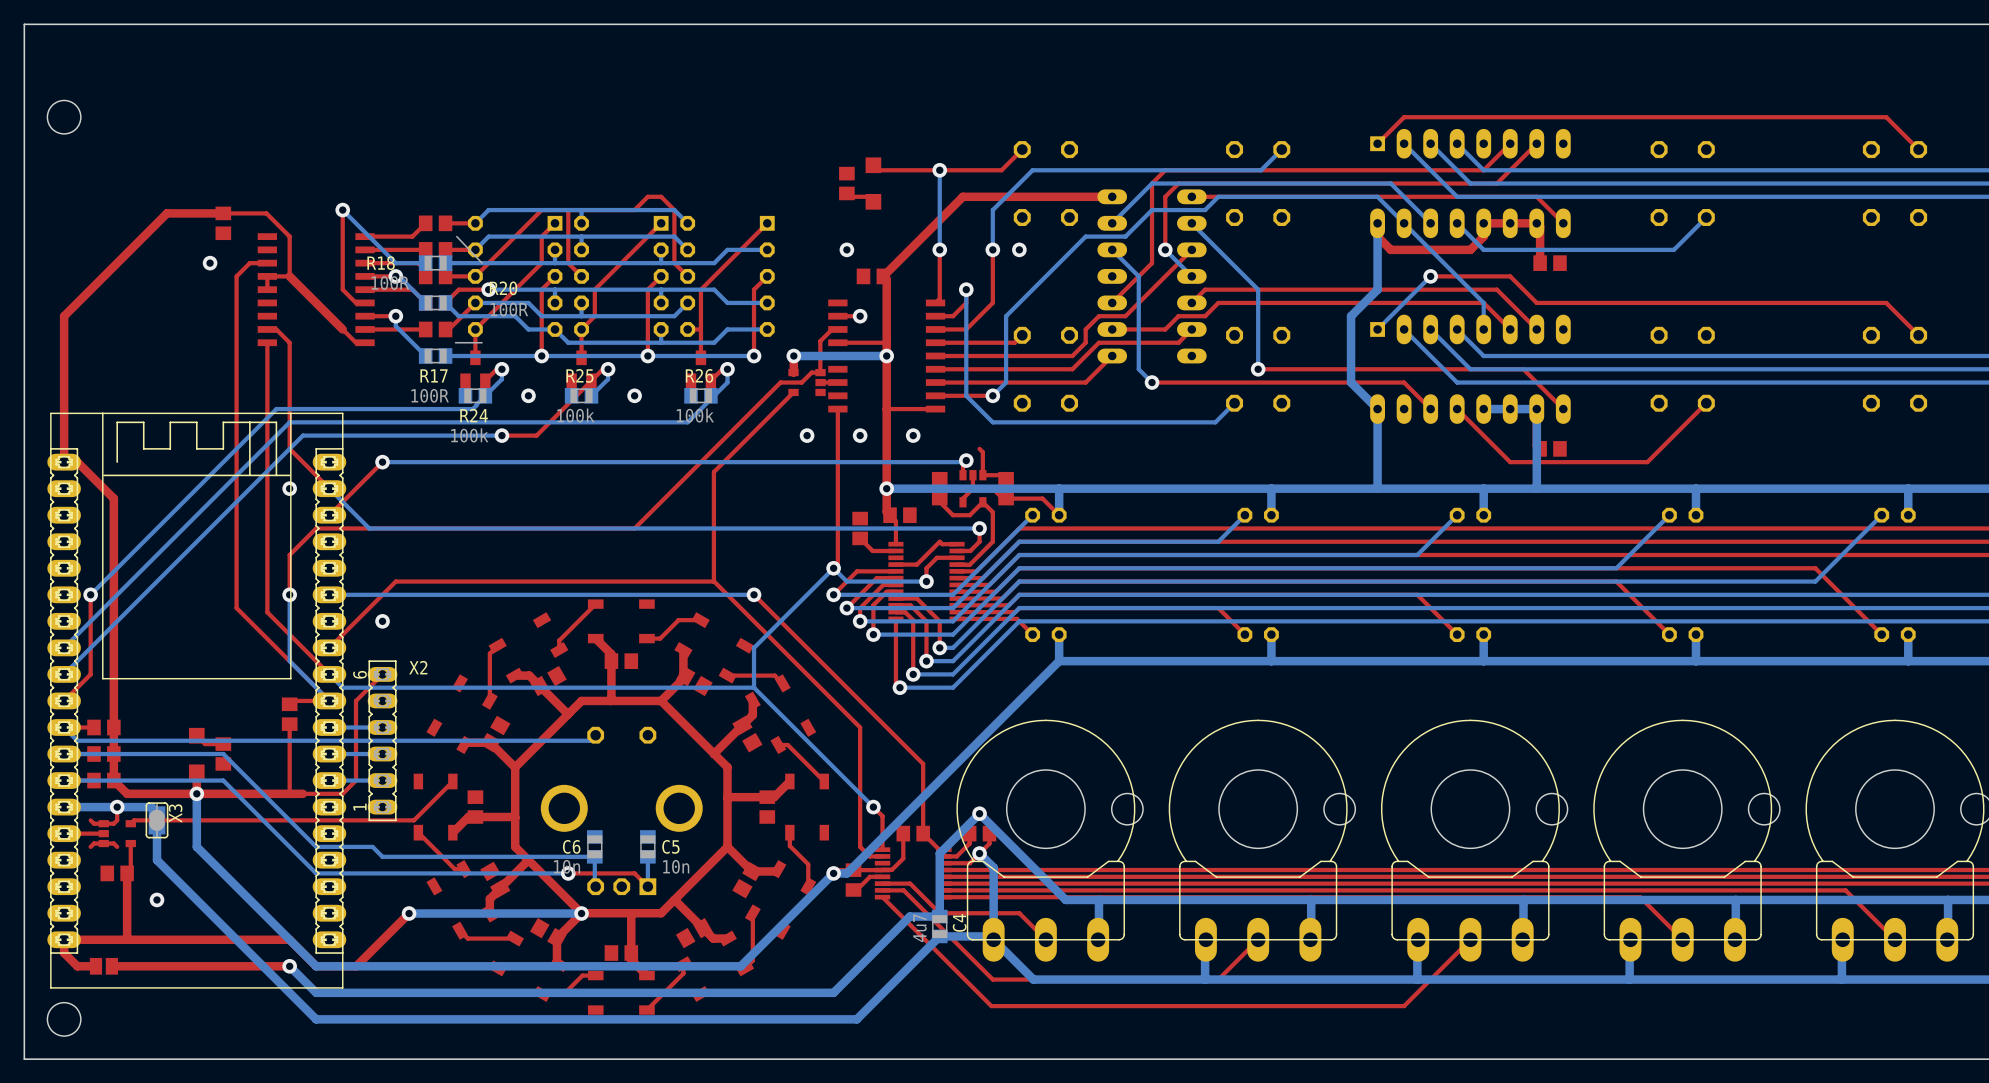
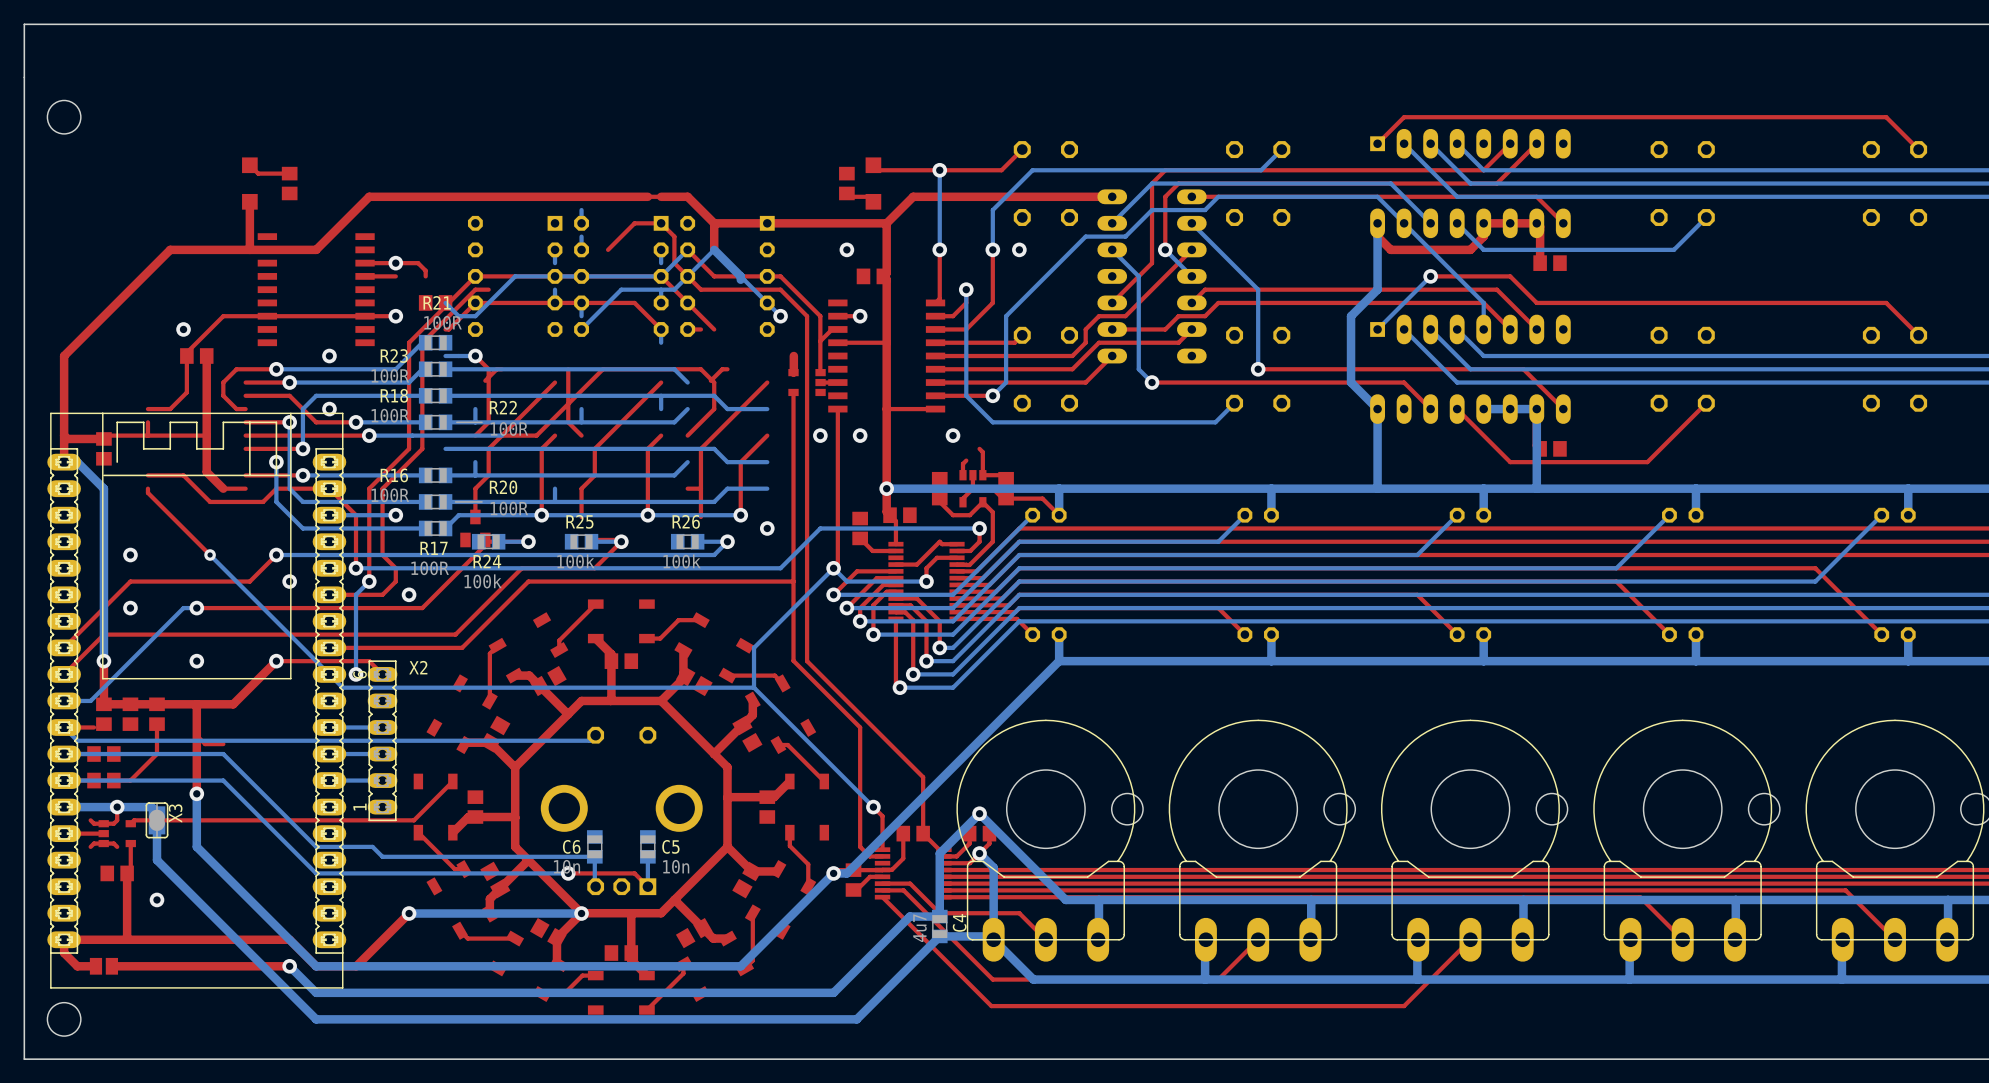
top track: none -> (249, 165) (258, 173) (289, 173)
part: none -> (249, 183)
part: none -> (289, 183)
top track: (647, 196) (634, 210) (541, 210) (475, 276) (445, 276) -> none
top track: (661, 196) (674, 210) (674, 236) -> (661, 196) (687, 196) (714, 223)
top track: (962, 196) (886, 273) -> (962, 196) (913, 196) (886, 223)
top track: none -> (249, 201) (249, 249)
top track: (342, 210) (342, 289) (356, 302) (365, 302) -> none
bottom track: (342, 210) (395, 263) (425, 263) -> none
via: (342, 210) -> none
top track: (568, 210) (568, 263) (581, 276) -> (568, 369) (568, 422) (581, 435)
part: (223, 223) -> none
top track: (425, 223) (412, 236) (365, 236) -> none
R23 side: top (435, 223) -> bottom (435, 369)
top track: (475, 223) (445, 223) -> none
top track: (555, 223) (541, 236) (541, 263) (475, 329) (475, 357) -> none
top track: (661, 223) (594, 289) (594, 316) (581, 329) (581, 357) -> (661, 382) (594, 448) (594, 475) (581, 488) (581, 516)
bottom track: (687, 223) (674, 210) (488, 210) (475, 223) -> none
top track: none -> (714, 223) (714, 249)
top track: (767, 223) (700, 289) (700, 357) -> (767, 382) (700, 448) (700, 516)
top track: none -> (886, 223) (886, 273)
top track: none -> (886, 223) (714, 223)
line: (456, 236) (482, 263) -> none
top track: none -> (674, 236) (661, 223) (634, 223) (608, 249)
top track: (425, 249) (365, 249) -> none
R22 side: top (435, 249) -> bottom (435, 422)
top track: (475, 249) (445, 249) -> none
top track: none -> (687, 249) (714, 276) (780, 276) (820, 316) (820, 341)
bottom track: (687, 249) (674, 236) (488, 236) (475, 249) -> (687, 249) (661, 276) (515, 276) (475, 316)
bottom track: (767, 249) (727, 249) (714, 263) (445, 263) -> (767, 488) (727, 488) (714, 501) (445, 501)
via: (210, 263) -> none
top track: (267, 263) (249, 263) (236, 276) (236, 608) (329, 700) (293, 700) (289, 704) -> none
R18 name position: R18 (381, 263) -> R18 (394, 395)
R18 position: (435, 263) -> (435, 395)
top track: (289, 276) (289, 236) (266, 213) (166, 213) (64, 316) (64, 356) -> (647, 196) (369, 196) (316, 249) (170, 249) (64, 356)
top track: (289, 276) (267, 276) (267, 289) -> none
top track: (289, 276) (356, 342) (365, 342) -> none
bottom track: (395, 276) (399, 276) (425, 302) -> none
via position: (395, 276) -> (395, 263)
R21 side: top (435, 276) -> bottom (435, 342)
top track: (555, 276) (541, 289) (541, 356) -> (555, 435) (541, 448) (541, 515)
top track: (661, 276) (647, 289) (647, 356) -> (661, 435) (647, 448) (647, 515)
top track: (767, 276) (754, 289) (754, 356) -> none
top track: (365, 289) (412, 289) (425, 302) -> none
top track: (475, 289) (458, 289) (445, 302) -> (475, 289) (422, 342) (422, 448) (382, 488) (382, 555) (395, 568) (395, 581)
via: (488, 289) -> none
bottom track: (621, 289) (488, 289) -> (621, 289) (581, 329)
bottom track: (674, 289) (714, 289) (727, 302) (767, 302) -> (674, 289) (714, 249) (740, 276) (740, 279) (744, 279) (780, 316)
R20 position: (435, 302) -> (435, 501)
top track: none -> (475, 302) (634, 302) (661, 329)
bottom track: (687, 302) (674, 316) (541, 316) (528, 302) (475, 302) -> none
top track: none -> (365, 316) (223, 316) (186, 352) (186, 392) (170, 409) (147, 409)
bottom track: (395, 316) (395, 326) (425, 356) -> none
bottom track: (475, 316) (515, 316) (528, 329) (555, 329) (568, 342) (714, 342) (727, 329) (767, 329) -> none
via: none -> (780, 316)
via: none -> (183, 329)
top track: (267, 329) (276, 329) (289, 342) (289, 448) (329, 488) -> none
top track: (425, 329) (365, 329) -> none
R16 side: top (435, 329) -> bottom (435, 475)
top track: none -> (714, 329) (661, 276) (475, 276) (409, 342) (409, 448) (369, 488) (369, 581)
top track: (267, 342) (267, 612) (329, 674) -> none
bottom track: none -> (425, 342) (422, 342) (395, 369) (276, 369)
line: (482, 342) (455, 342) -> (482, 501) (455, 501)
part: none -> (196, 356)
top track: none -> (206, 356) (206, 472) (223, 488) (245, 488)
via: none -> (329, 356)
R17 position: (435, 356) -> (435, 528)
top track: none -> (475, 356) (488, 369) (488, 422) (475, 435)
via: (541, 356) -> none
via: (647, 356) -> none
bottom track: (754, 356) (475, 356) -> none
via: (754, 356) -> none
via: (793, 356) -> none
bottom track: (886, 356) (793, 356) -> none
via: (886, 356) -> none
top track: none -> (276, 369) (236, 369) (223, 382) (223, 395) (236, 409) (245, 409)
via: none -> (276, 369)
bottom track: none -> (425, 369) (422, 369) (409, 382) (289, 382)
bottom track: none -> (445, 369) (674, 369) (687, 382)
part: (475, 369) -> none
bottom track: (501, 369) (501, 379) (472, 409) (276, 409) (90, 594) -> none
via position: (501, 369) -> (475, 356)
part: (581, 369) -> none
top track: none -> (608, 369) (700, 369) (714, 382) (714, 409) (687, 435)
bottom track: (608, 369) (608, 379) (591, 395) -> none
via: (608, 369) -> none
part: (700, 369) -> none
bottom track: (727, 369) (727, 382) (687, 422) (674, 422) -> (687, 409) (674, 422)
via: (727, 369) -> none
top track: (820, 372) (811, 372) (801, 382) (780, 382) (634, 528) (316, 528) (289, 555) (289, 594) -> none
top track: none -> (289, 382) (245, 382)
via: none -> (289, 382)
top track: none -> (555, 382) (488, 448) (488, 475) (475, 488) (475, 516)
top track: (793, 392) (713, 472) (713, 581) -> (793, 392) (793, 660)
top track: none -> (245, 395) (289, 395) (316, 422) (356, 422)
bottom track: none -> (425, 395) (316, 395) (302, 409) (302, 448)
R24 position: (475, 395) -> (488, 541)
via: (528, 395) -> none
R25 position: (581, 395) -> (581, 541)
via: (634, 395) -> none
bottom track: none -> (661, 395) (661, 409)
R26 position: (700, 395) -> (687, 541)
bottom track: none -> (710, 395) (445, 395)
bottom track: none -> (714, 395) (727, 409) (767, 409)
via: none -> (329, 409)
bottom track: none -> (475, 409) (475, 422)
bottom track: none -> (581, 409) (581, 422)
top track: none -> (147, 422) (147, 435)
top track: none -> (289, 422) (245, 422)
bottom track: none -> (289, 422) (289, 488) (302, 501) (425, 501)
via: none -> (289, 422)
bottom track: (356, 422) (289, 422) (64, 647) -> none
via: none -> (356, 422)
bottom track: (445, 422) (425, 422) -> none
line: none -> (482, 422) (456, 422)
top track: none -> (206, 435) (107, 435) (103, 438) (67, 438) (64, 435)
top track: none -> (369, 435) (245, 435)
bottom track: (369, 435) (302, 435) (64, 674) -> none
via: none -> (369, 435)
via: (501, 435) -> none
top track: none -> (767, 435) (740, 462) (740, 515)
via position: (807, 435) -> (820, 435)
via: (913, 435) -> none
via: none -> (953, 435)
part: none -> (103, 448)
top track: none -> (302, 448) (245, 448)
via: none -> (302, 448)
bottom track: (966, 460) (964, 462) (767, 462) -> none
via: (966, 460) -> none
top track: (64, 462) (77, 462) (113, 498) (113, 780) (127, 793) (342, 793) (356, 780) (356, 700) (382, 674) -> (103, 661) (103, 704) (233, 704) (276, 661) (369, 661) (382, 674)
bottom track: none -> (64, 462) (77, 462) (103, 488) (103, 661)
via: none -> (276, 462)
top track: (382, 462) (329, 515) -> none
via: (382, 462) -> none
bottom track: none -> (475, 462) (475, 475)
bottom track: none -> (687, 462) (674, 475) (445, 475)
bottom track: (727, 462) (382, 462) -> (727, 462) (714, 448) (445, 448)
top track: none -> (147, 475) (183, 475) (210, 501) (263, 501) (276, 488) (329, 488) (356, 515) (356, 568)
top track: none -> (302, 475) (245, 475)
via: none -> (302, 475)
bottom track: none -> (425, 475) (302, 475)
top track: none -> (147, 488) (147, 492) (210, 555)
via: (289, 488) -> none
bottom track: (329, 488) (369, 528) -> (276, 462) (276, 501) (302, 528) (369, 528)
bottom track: none -> (555, 488) (555, 501)
top track: none -> (700, 488) (687, 488)
bottom track: none -> (395, 515) (329, 515)
via: none -> (395, 515)
via: none -> (541, 515)
via: none -> (647, 515)
bottom track: none -> (740, 515) (458, 515) (445, 528)
via: none -> (740, 515)
part: none -> (475, 528)
via: none -> (767, 528)
bottom track: (820, 528) (425, 528) -> (820, 528) (780, 568) (356, 568)
top track: none -> (591, 539) (619, 539) (621, 541) (594, 568) (521, 568) (455, 634) (103, 634) (64, 674)
top track: none -> (528, 541) (487, 541) (485, 539) (485, 545) (422, 608) (196, 608)
bottom track: none -> (528, 541) (498, 541)
via: none -> (528, 541)
bottom track: none -> (621, 541) (591, 541)
via: none -> (621, 541)
bottom track: none -> (697, 541) (727, 541) (714, 555) (276, 555)
via: none -> (727, 541)
via: none -> (130, 555)
bottom track: none -> (210, 555) (329, 674)
via: none -> (210, 555)
top track: none -> (276, 555) (249, 581) (130, 581) (64, 647)
via: none -> (276, 555)
via: none -> (356, 568)
bottom track: none -> (369, 581) (356, 594) (356, 674)
via: none -> (369, 581)
top track: (528, 581) (395, 581) -> (528, 581) (462, 647) (329, 647)
top track: (714, 581) (793, 660) -> (714, 581) (793, 581)
top track: (90, 594) (90, 674) (64, 700) -> none
via: (90, 594) -> none
bottom track: (289, 594) (289, 661) (329, 700) -> none
via position: (289, 594) -> (289, 581)
top track: (382, 594) (329, 647) -> (382, 594) (329, 594)
via: none -> (409, 594)
top track: (754, 594) (923, 763) (923, 777) -> (687, 276) (700, 289) (780, 289) (807, 316) (807, 661) (923, 777)
bottom track: (754, 594) (329, 594) -> none
via: (754, 594) -> none
via: none -> (130, 608)
bottom track: none -> (196, 608) (183, 608) (90, 700) (64, 700)
via: none -> (196, 608)
via: (382, 621) -> none
via: none -> (103, 661)
via: none -> (196, 661)
via: none -> (276, 661)
via: none -> (356, 674)
top track: none -> (196, 704) (196, 772)
part: none -> (130, 714)
part: none -> (157, 714)
part: (289, 714) -> none
top track: none -> (157, 724) (157, 754) (130, 780) (94, 780)
top track: (289, 724) (289, 793) -> none
part rotation: 0° (103, 727) -> 90° clockwise (103, 714)
part: (196, 754) -> none
part: (223, 754) -> none

